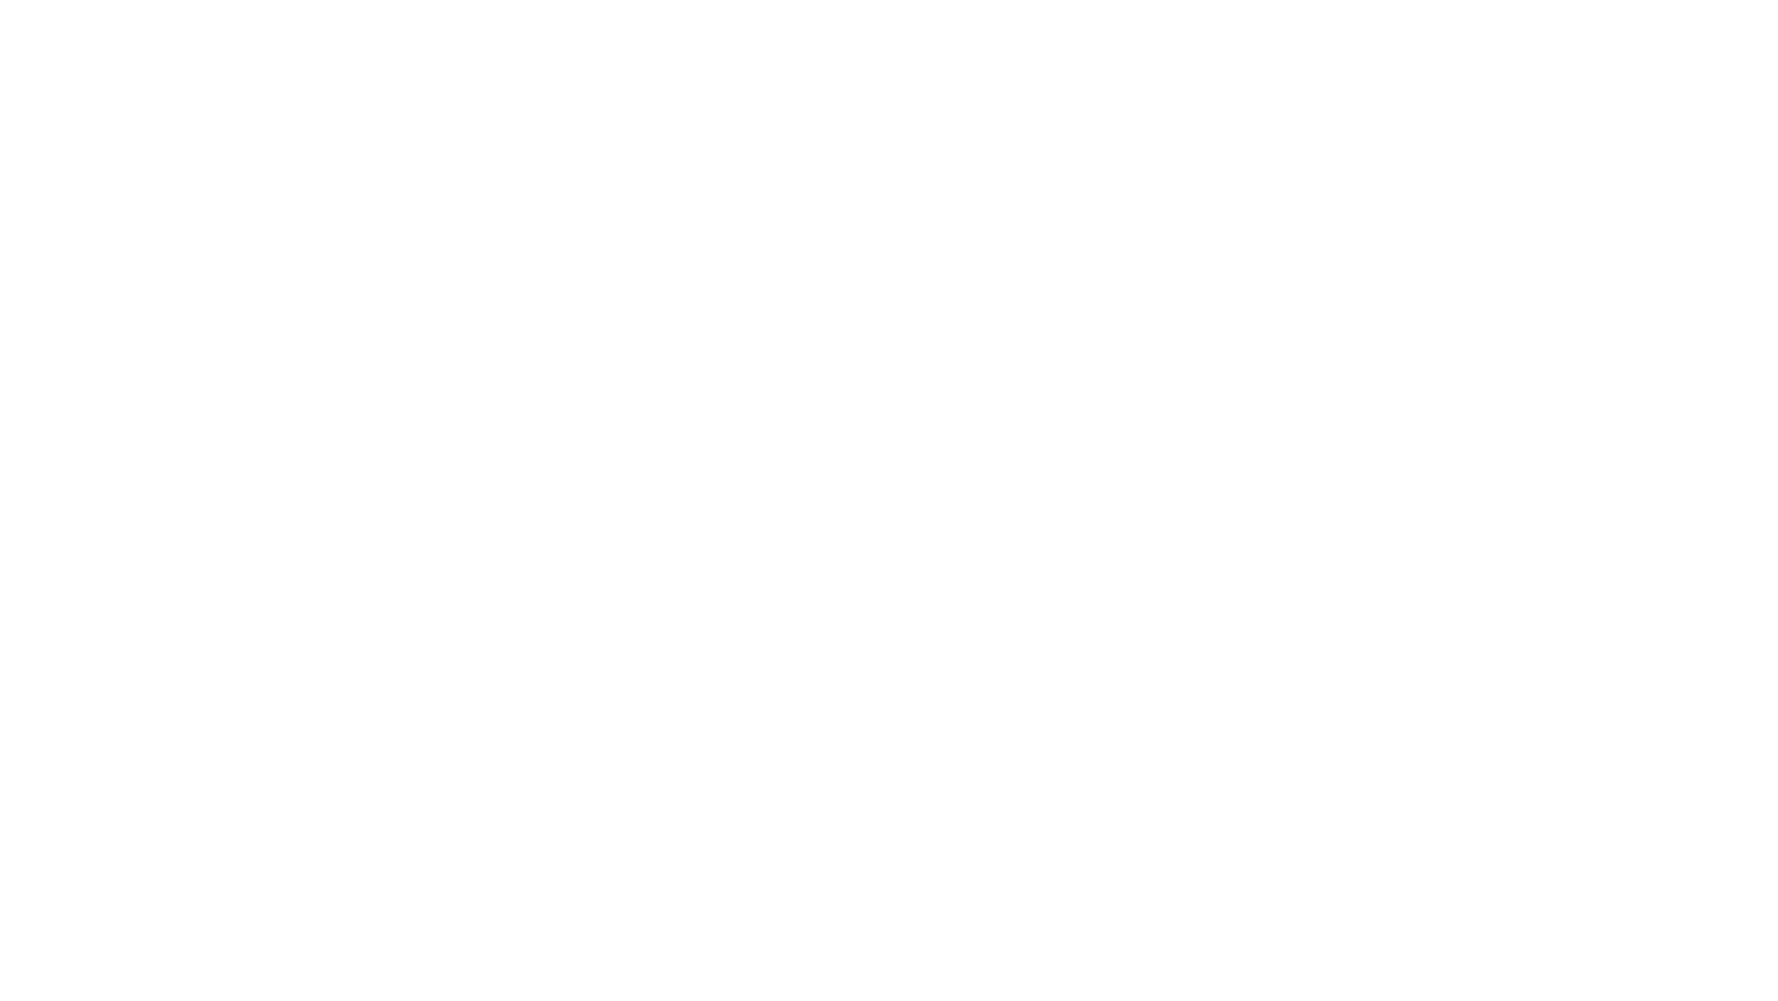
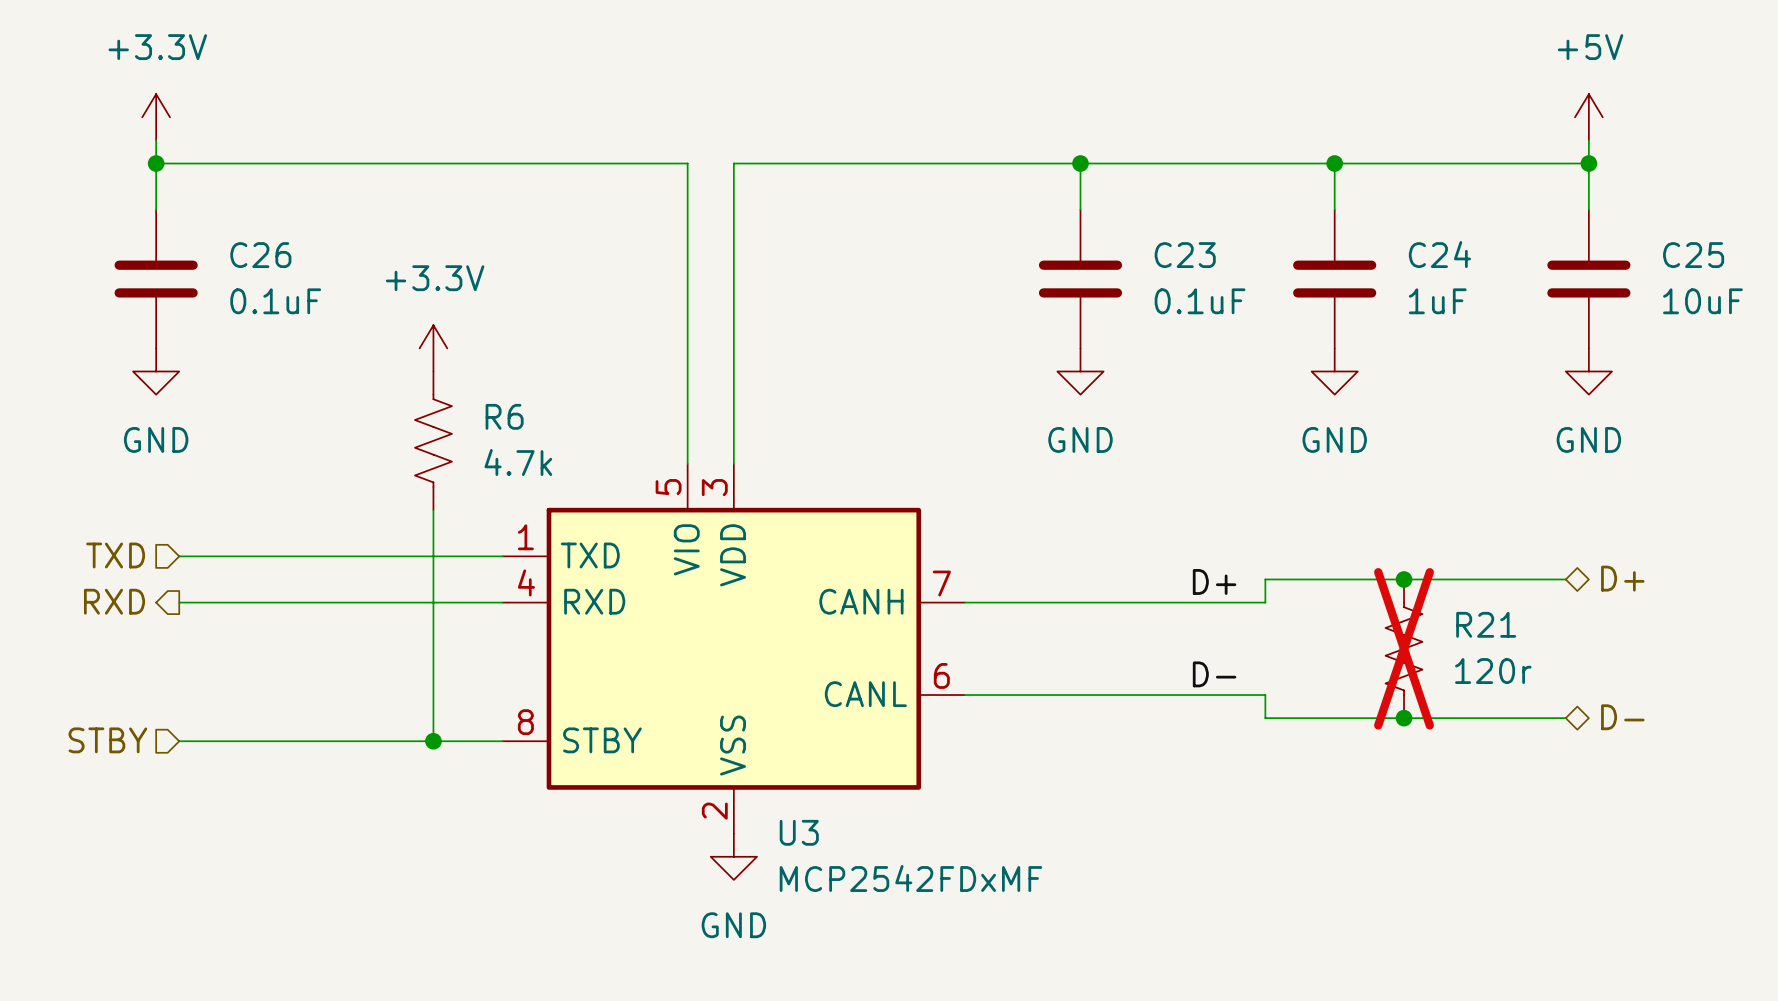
power symbol: none -> +3.3V (156, 117)
power symbol: none -> +5V (1588, 117)
wire: none -> (156, 140) (156, 209)
wire: none -> (1588, 140) (1588, 209)
wire: none -> (156, 163) (687, 163) (687, 463)
junction: none -> (156, 163)
wire: none -> (1080, 163) (1080, 209)
junction: none -> (1080, 163)
wire: none -> (1334, 163) (1334, 209)
junction: none -> (1334, 163)
wire: none -> (1588, 163) (733, 163) (733, 463)
junction: none -> (1588, 163)
C26: none -> 0.1uF (156, 279)
C23: none -> 0.1uF (1080, 279)
C24: none -> 1uF (1334, 279)
C25: none -> 10uF (1588, 279)
power symbol: none -> +3.3V (433, 348)
power symbol: none -> GND (156, 371)
power symbol: none -> GND (1080, 371)
power symbol: none -> GND (1334, 371)
power symbol: none -> GND (1588, 371)
R6: none -> 4.7k (433, 440)
wire: none -> (433, 510) (433, 741)
hierarchical label: none -> TXD (115, 555)
wire: none -> (179, 556) (502, 556)
hierarchical label: none -> D+ (1622, 578)
junction: none -> (1404, 579)
wire: none -> (1565, 579) (1265, 579) (1265, 602) (964, 602)
label: none -> D+ (1214, 581)
hierarchical label: none -> RXD (114, 601)
wire: none -> (179, 602) (502, 602)
U3: none -> MCP2542FDxMF (733, 648)
R21: none -> 120r (1404, 648)
label: none -> D- (1214, 674)
wire: none -> (964, 695) (1265, 695) (1265, 718) (1565, 718)
hierarchical label: none -> D- (1622, 717)
junction: none -> (1404, 718)
hierarchical label: none -> STBY (107, 740)
wire: none -> (179, 741) (502, 741)
junction: none -> (433, 741)
power symbol: none -> GND (733, 856)

